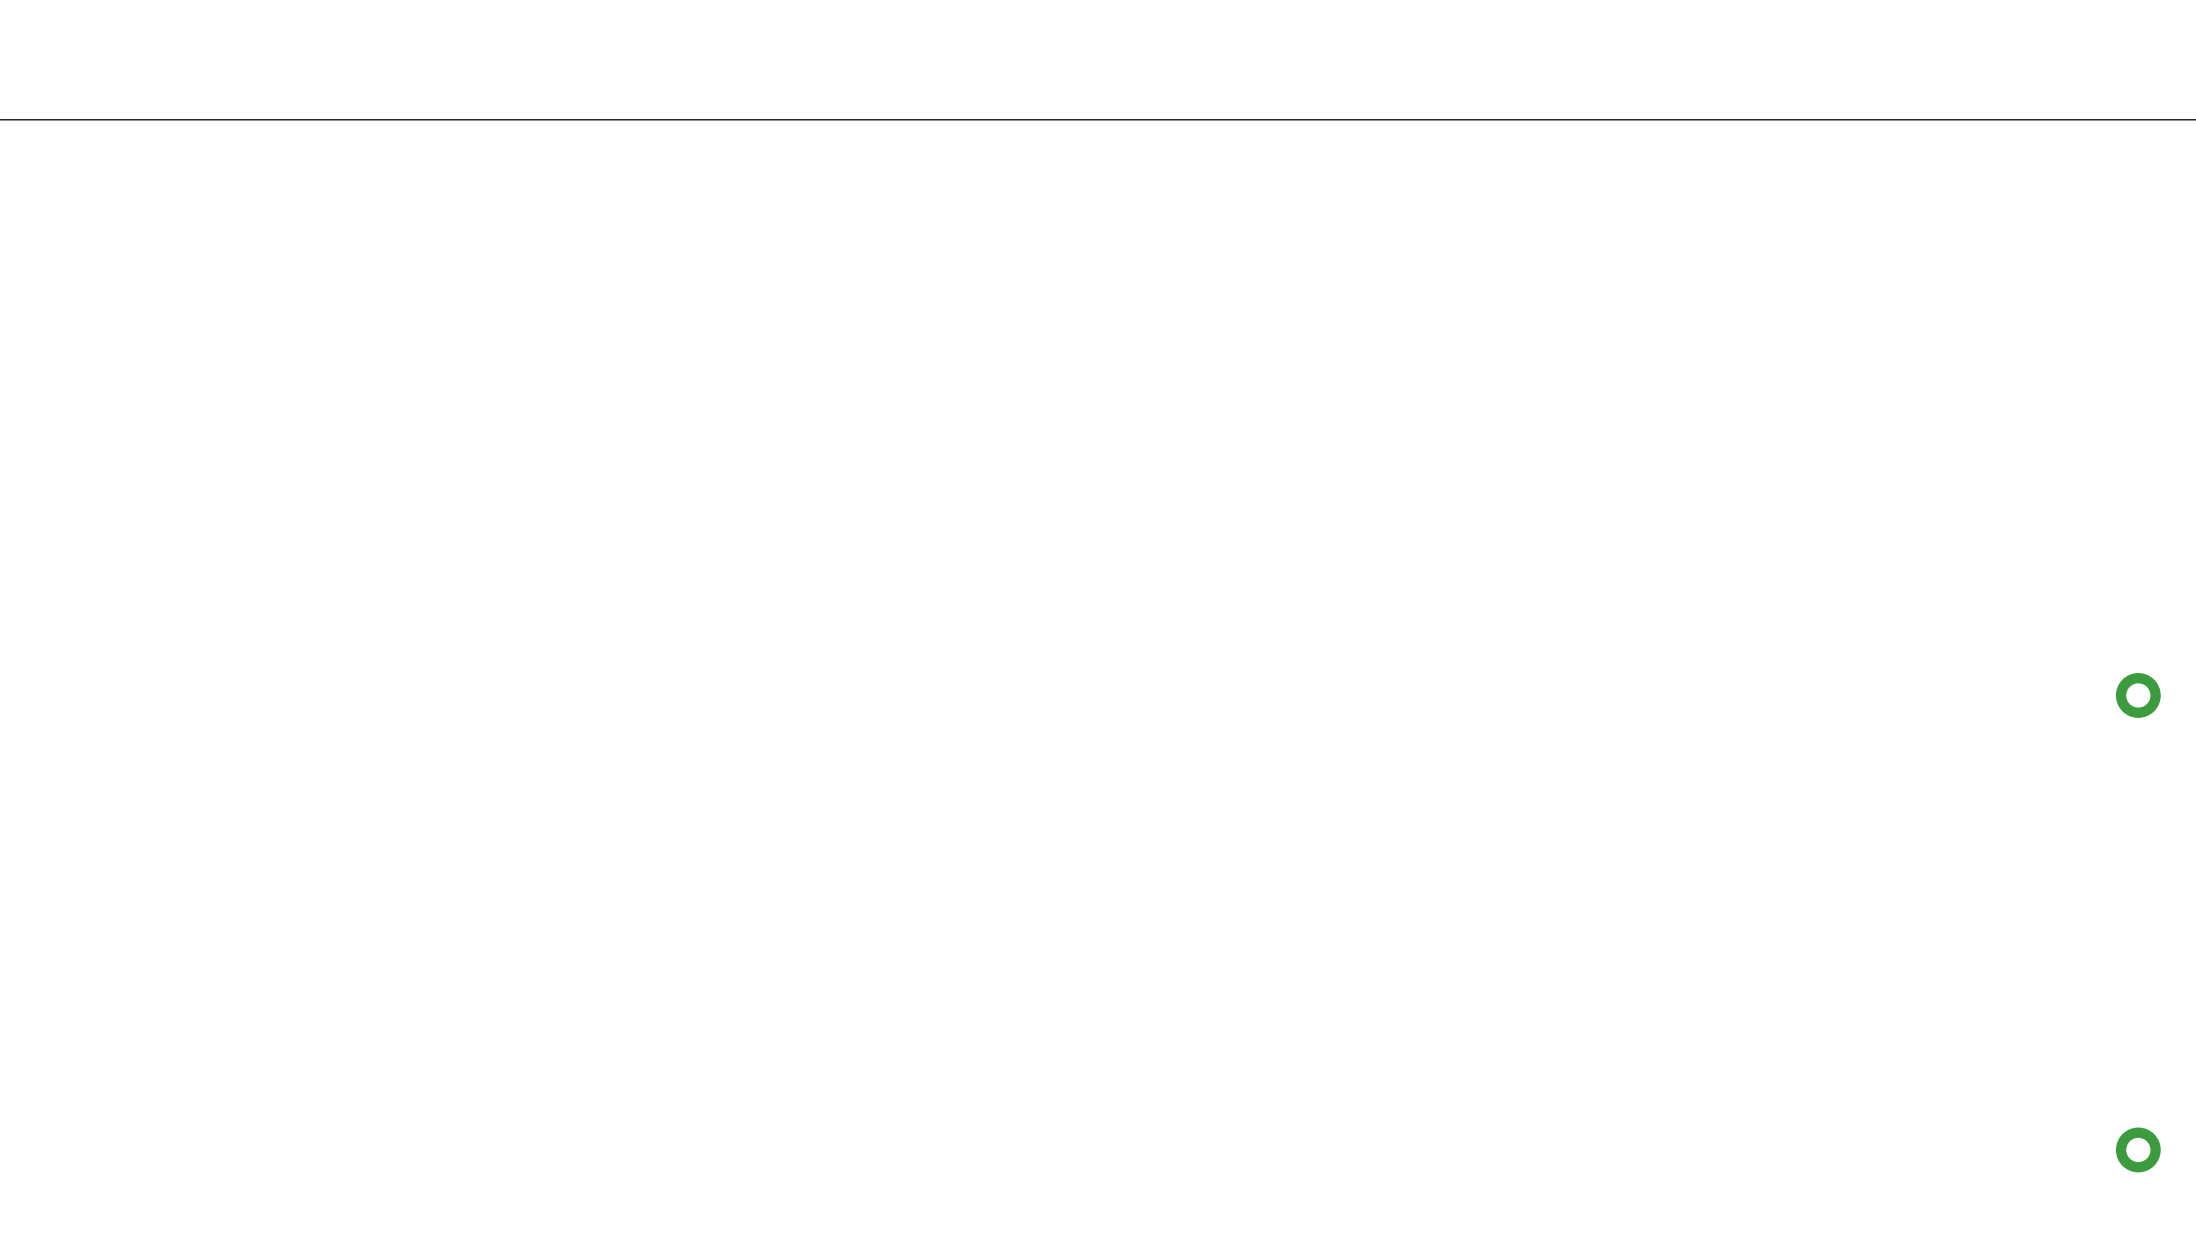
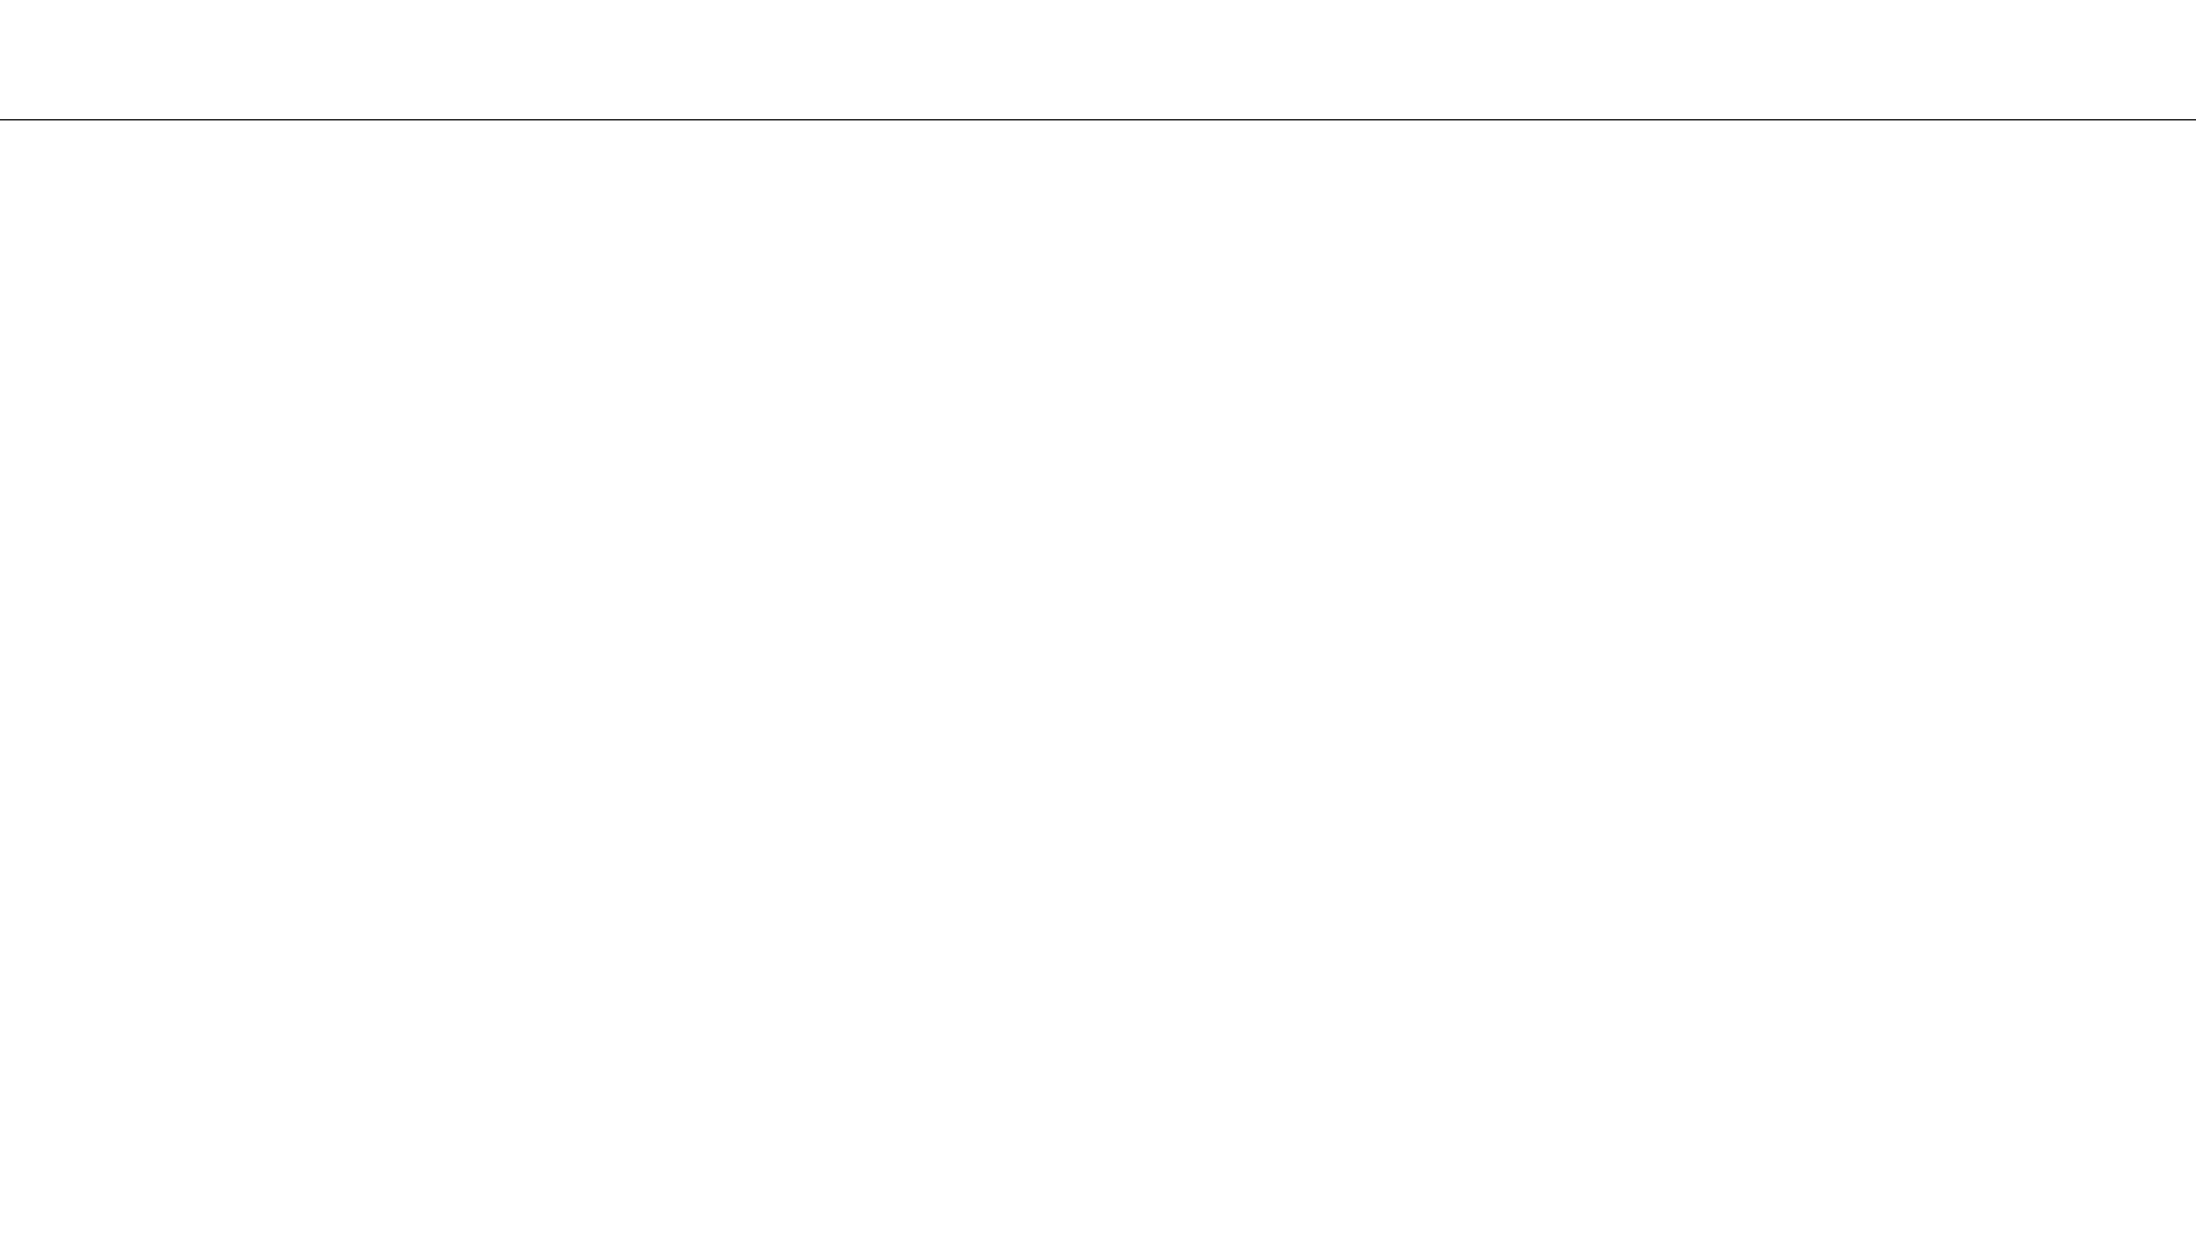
part: (2138, 695) -> none
part: (2138, 1149) -> none

